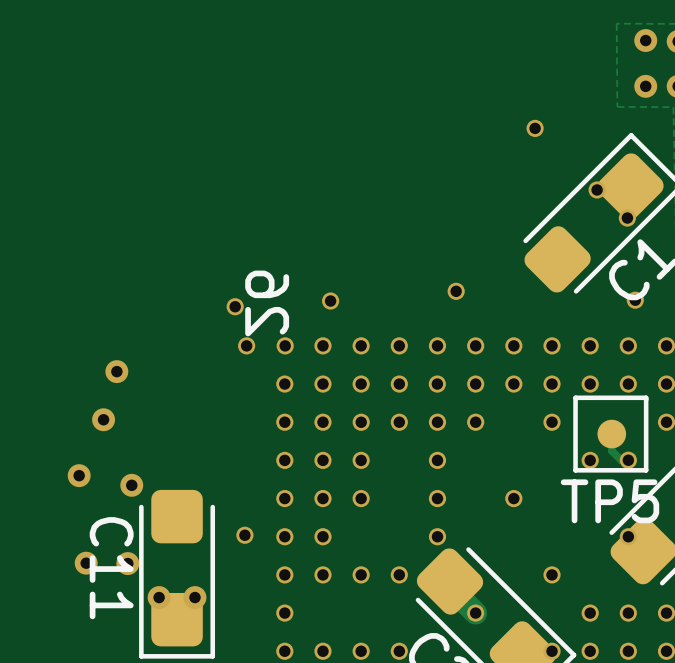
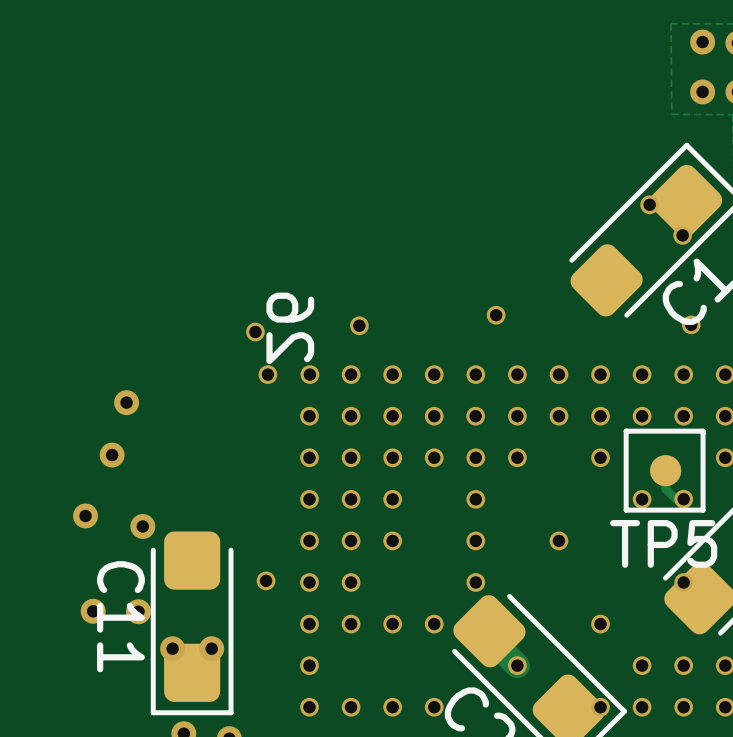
via: (535, 128) -> none

